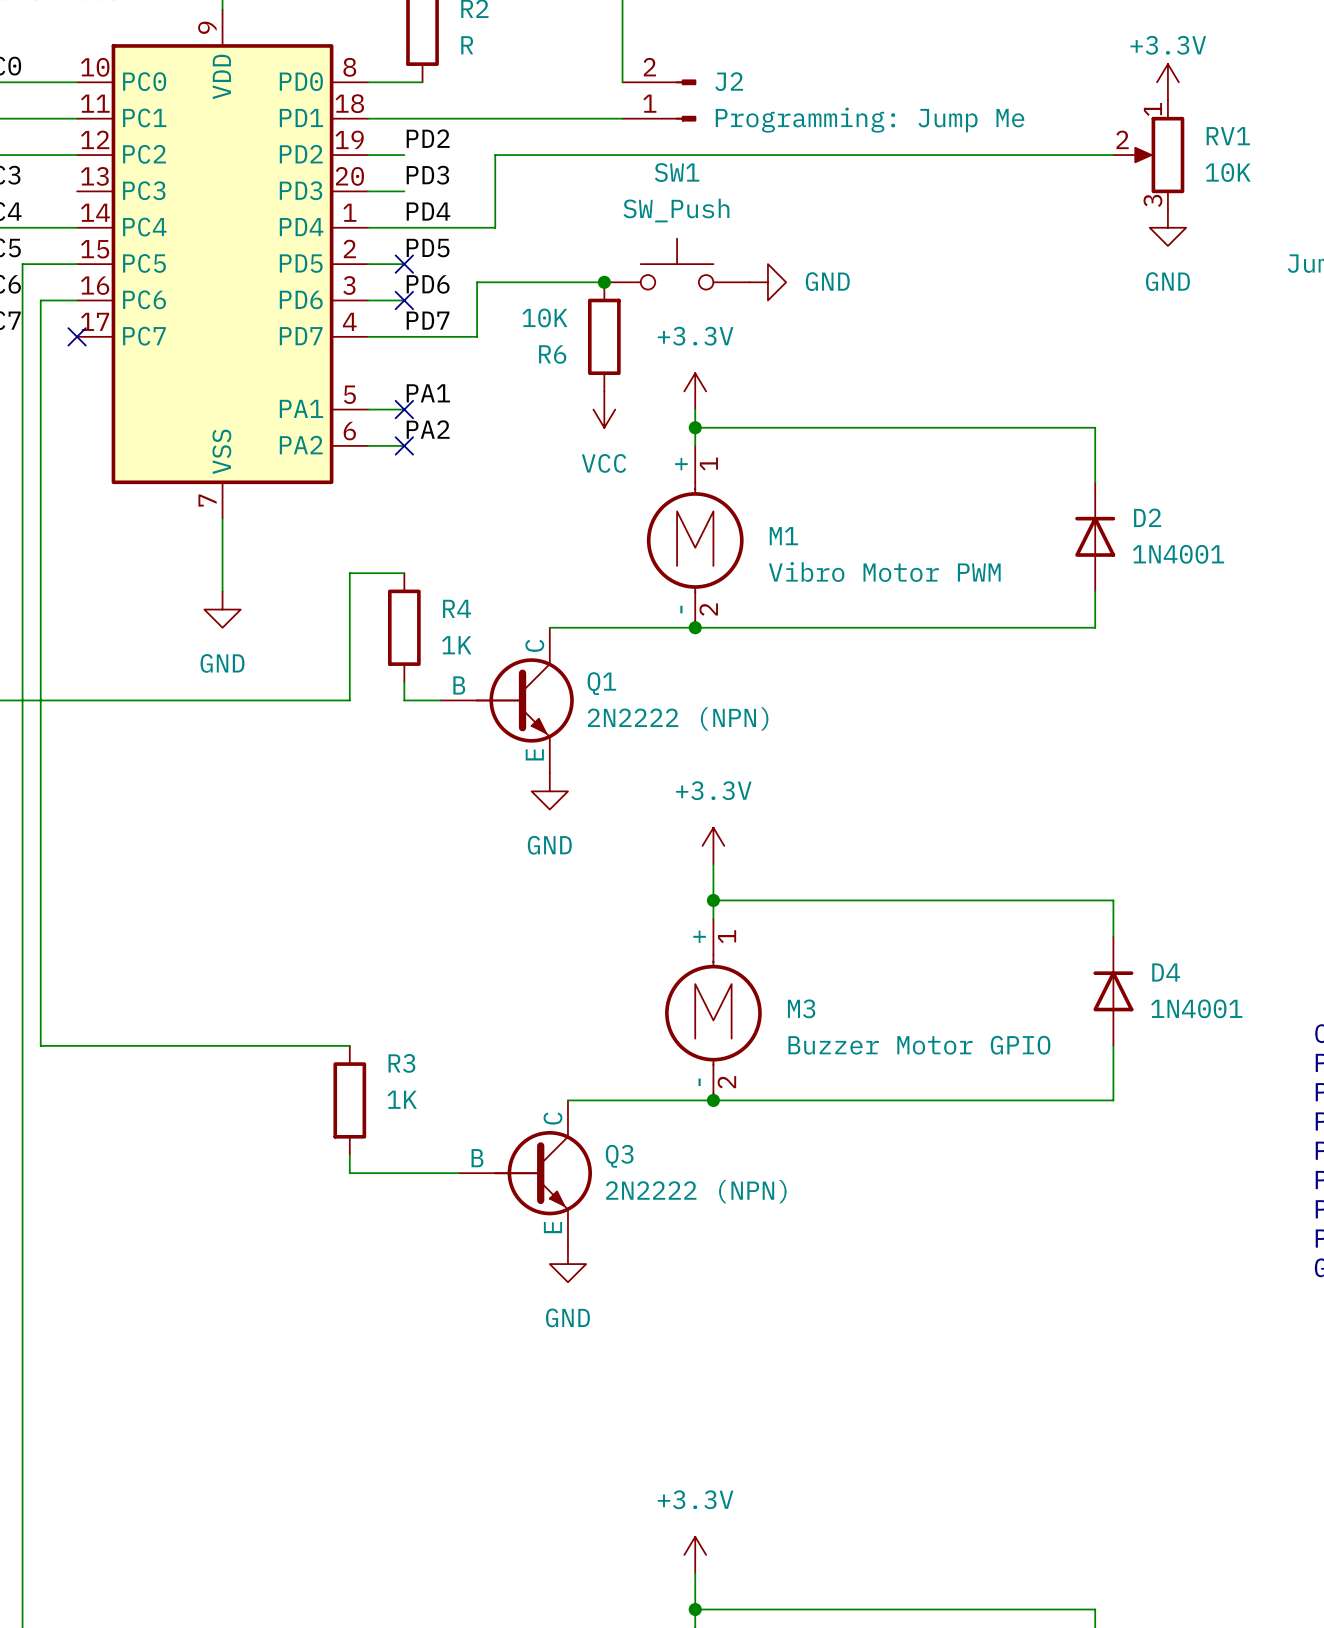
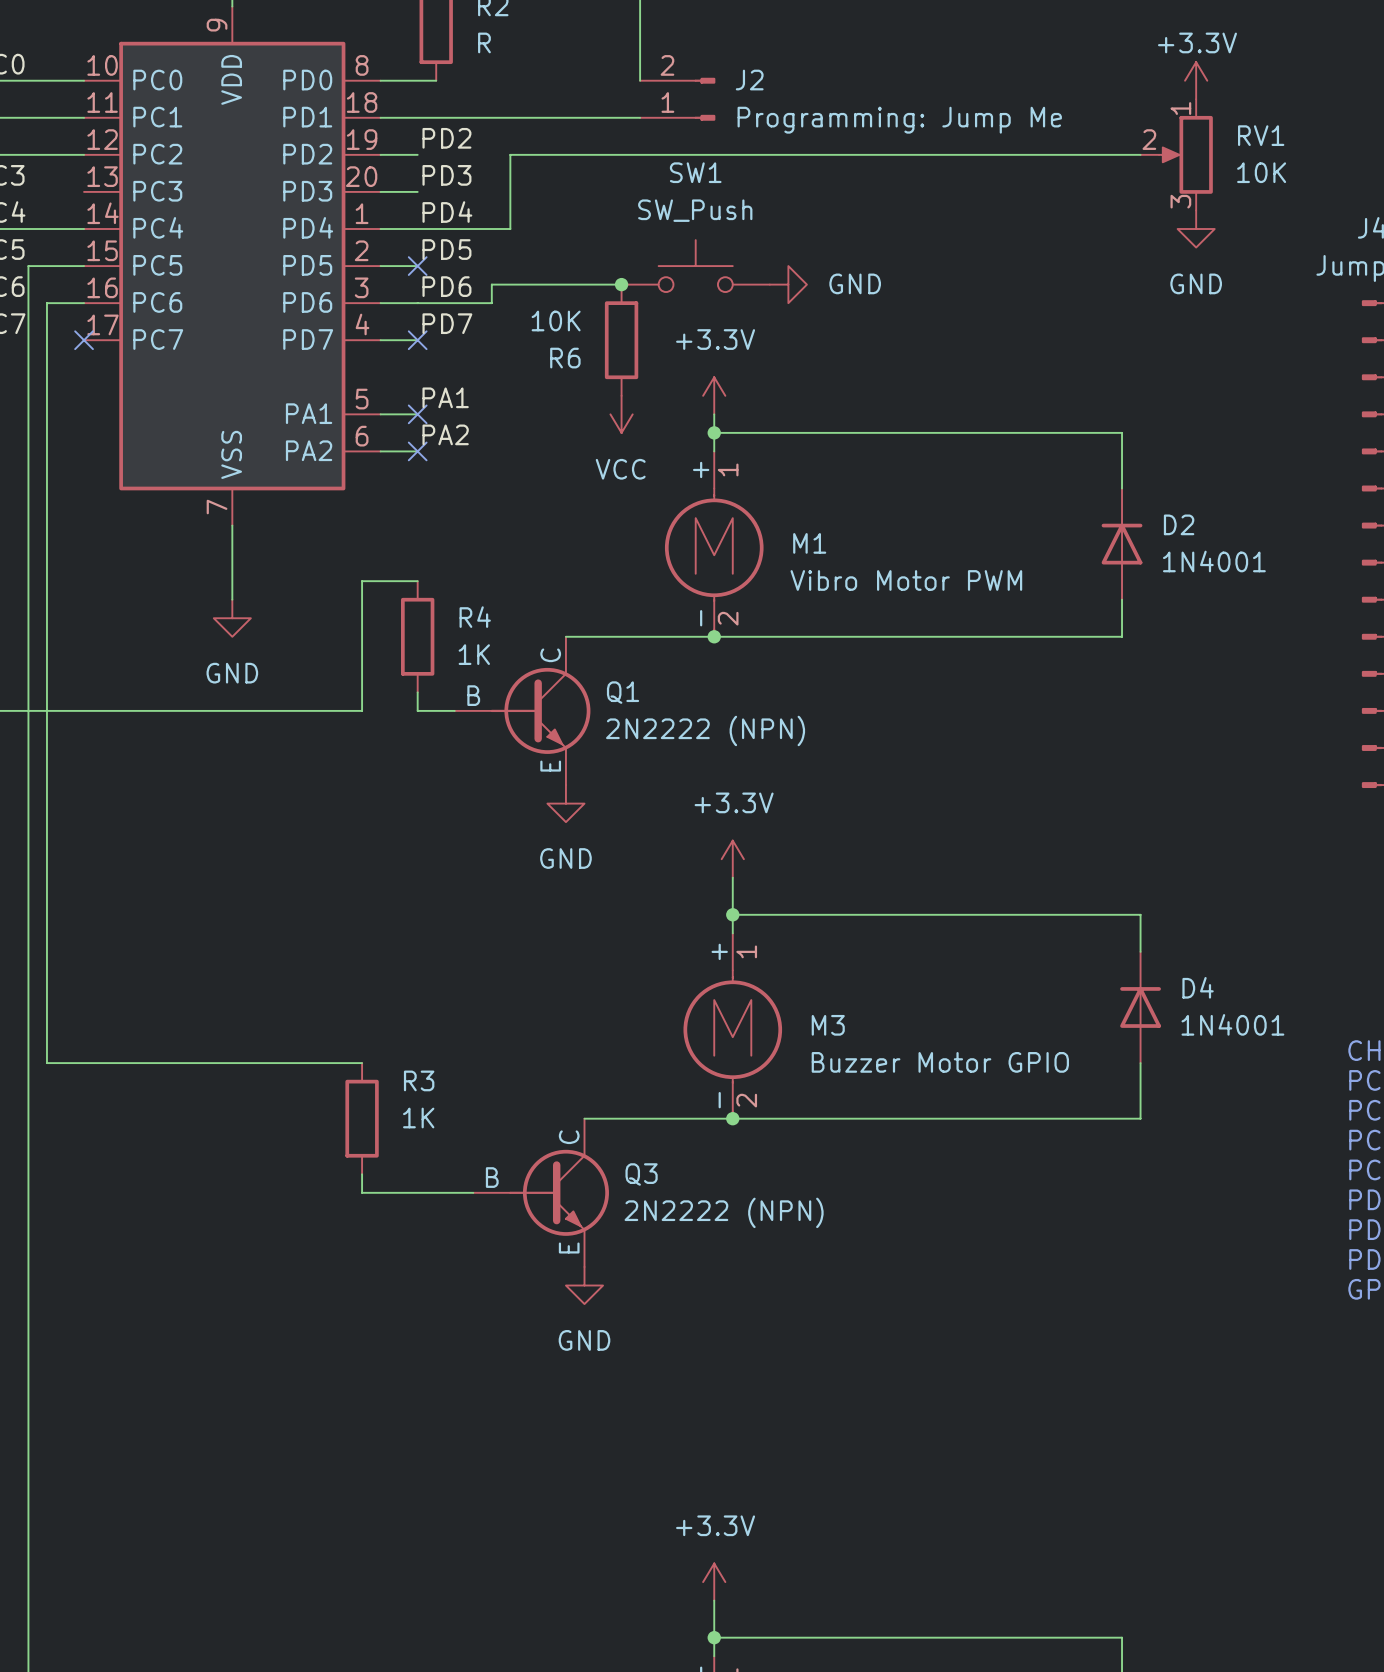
no-connect mark position: (404, 300) -> (417, 340)
wire: (477, 300) (477, 336) (404, 336) -> (491, 303) (417, 303)

